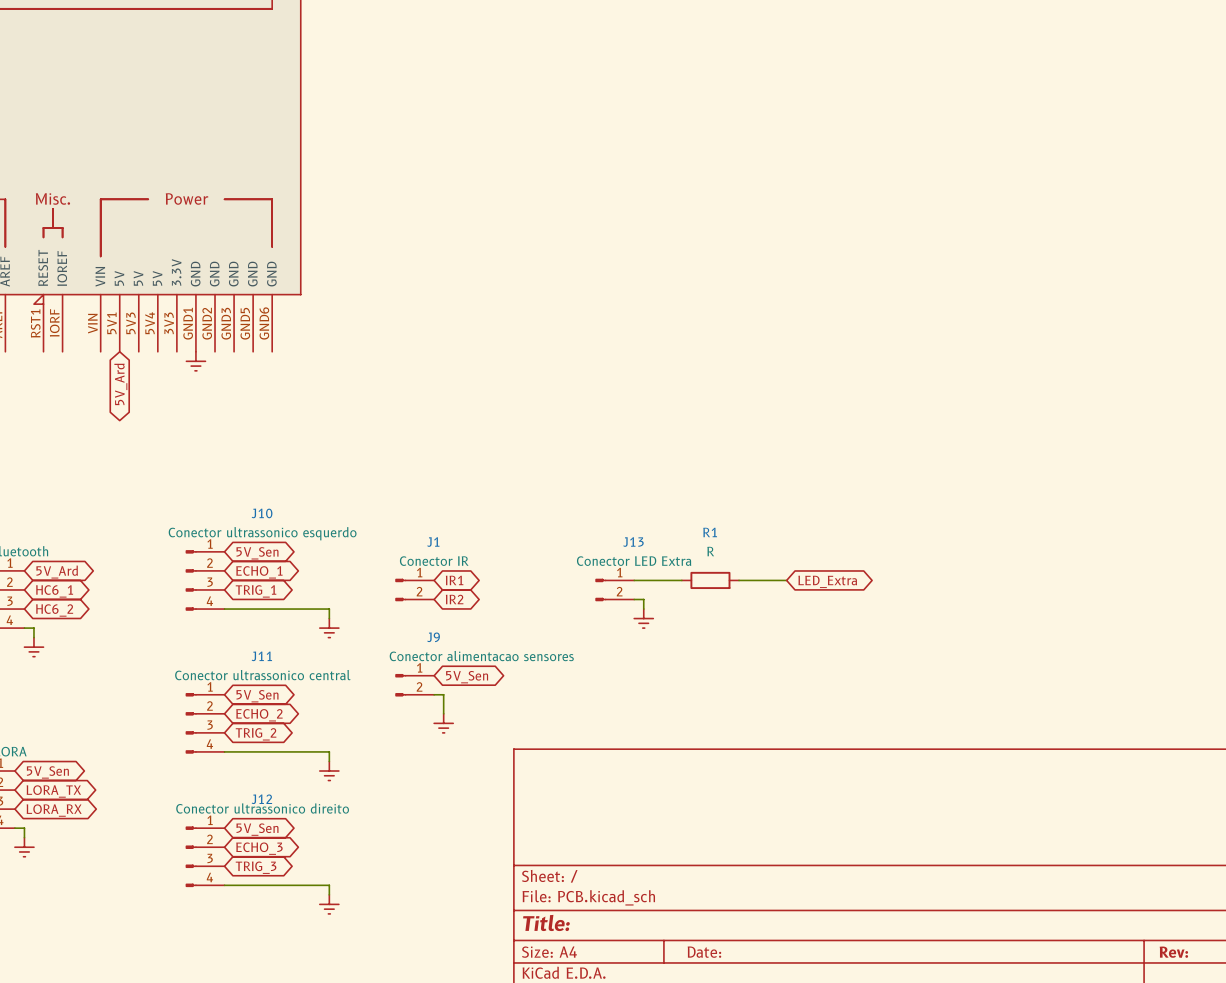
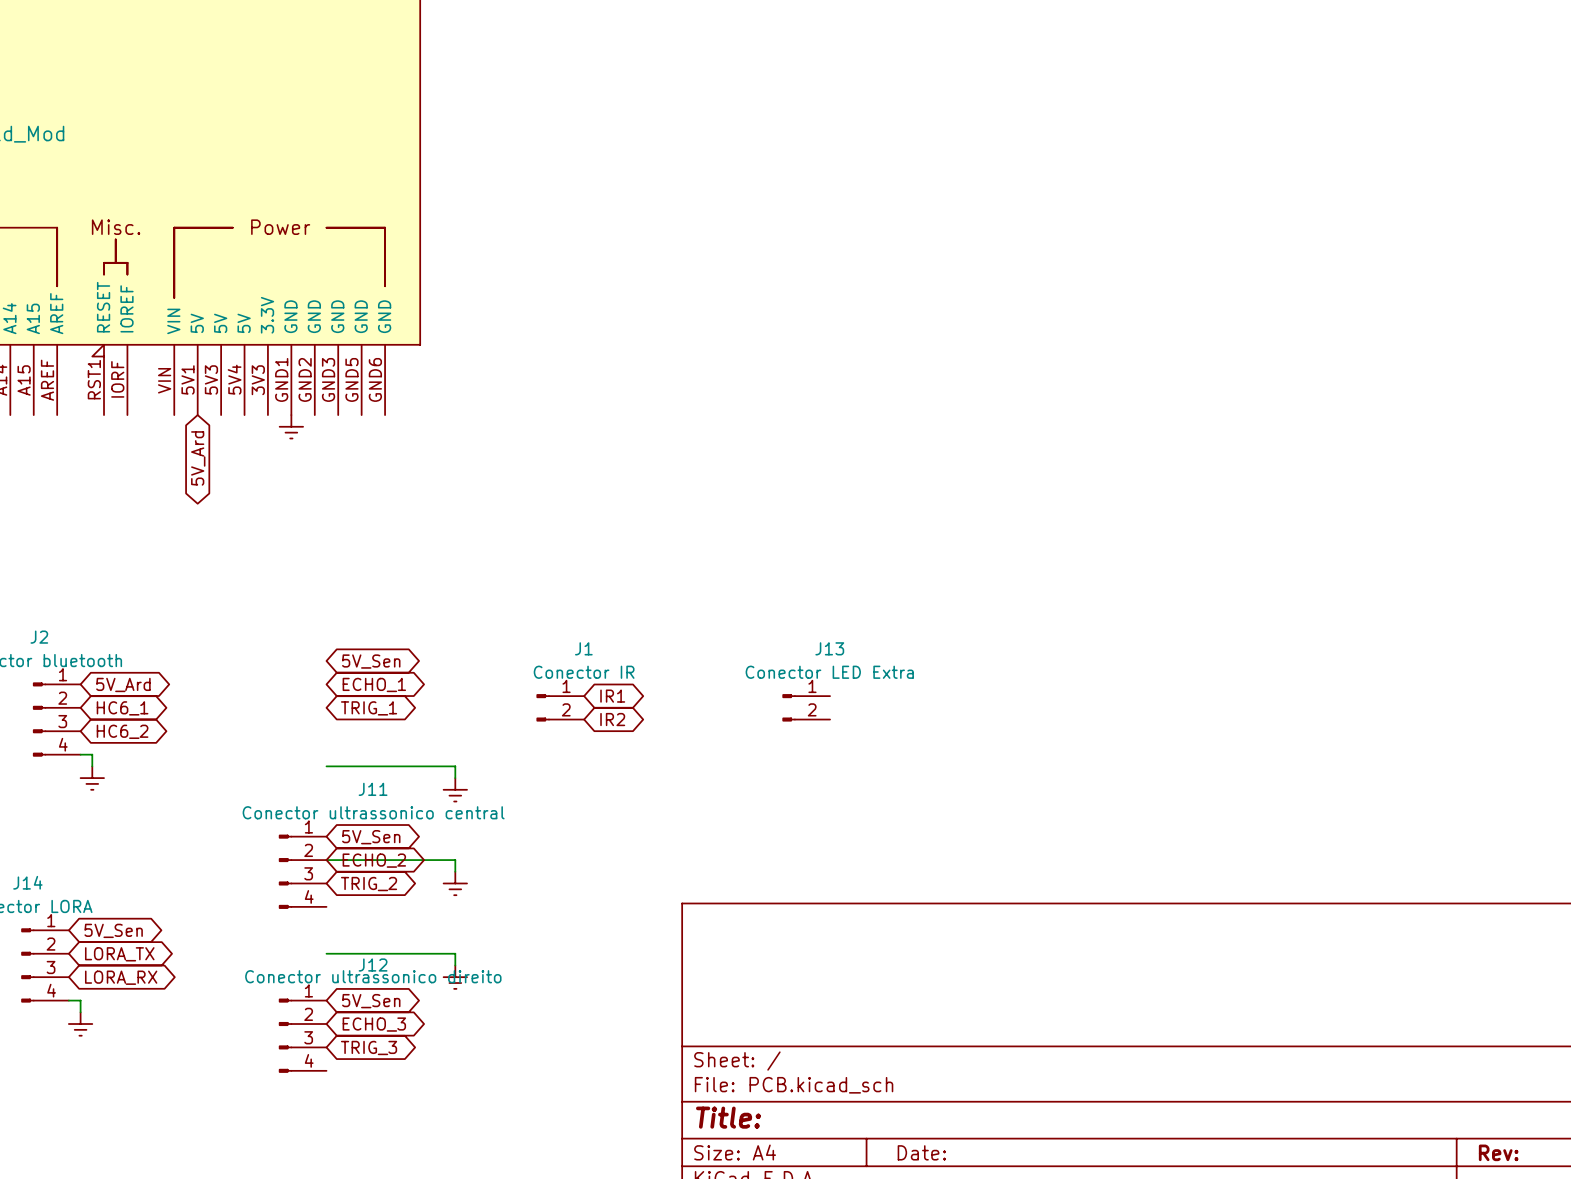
J10: Conector ultrassonico esquerdo (205, 580) -> none
wire: (634, 580) (681, 580) -> none
R1: R (710, 580) -> none
wire: (739, 580) (786, 580) -> none
global label: LED_Extra (827, 581) -> none
wire: (634, 599) (643, 599) (643, 609) -> none
wire: (224, 609) (329, 609) (329, 618) -> (326, 766) (455, 766) (455, 778)
power symbol: (643, 618) -> none
power symbol position: (329, 628) -> (455, 789)
global label: 5V_Sen (467, 677) -> none
J9: Conector alimentacao sensores (414, 685) -> none
wire: (434, 694) (443, 694) (443, 713) -> none
power symbol: (443, 723) -> none
power symbol: none -> (455, 883)
wire: (224, 751) (329, 751) (329, 761) -> (326, 860) (455, 860) (455, 871)
power symbol: (329, 771) -> none
power symbol: none -> (455, 977)
wire: (224, 885) (329, 885) (329, 894) -> (326, 953) (455, 953) (455, 965)
power symbol: (329, 904) -> none

